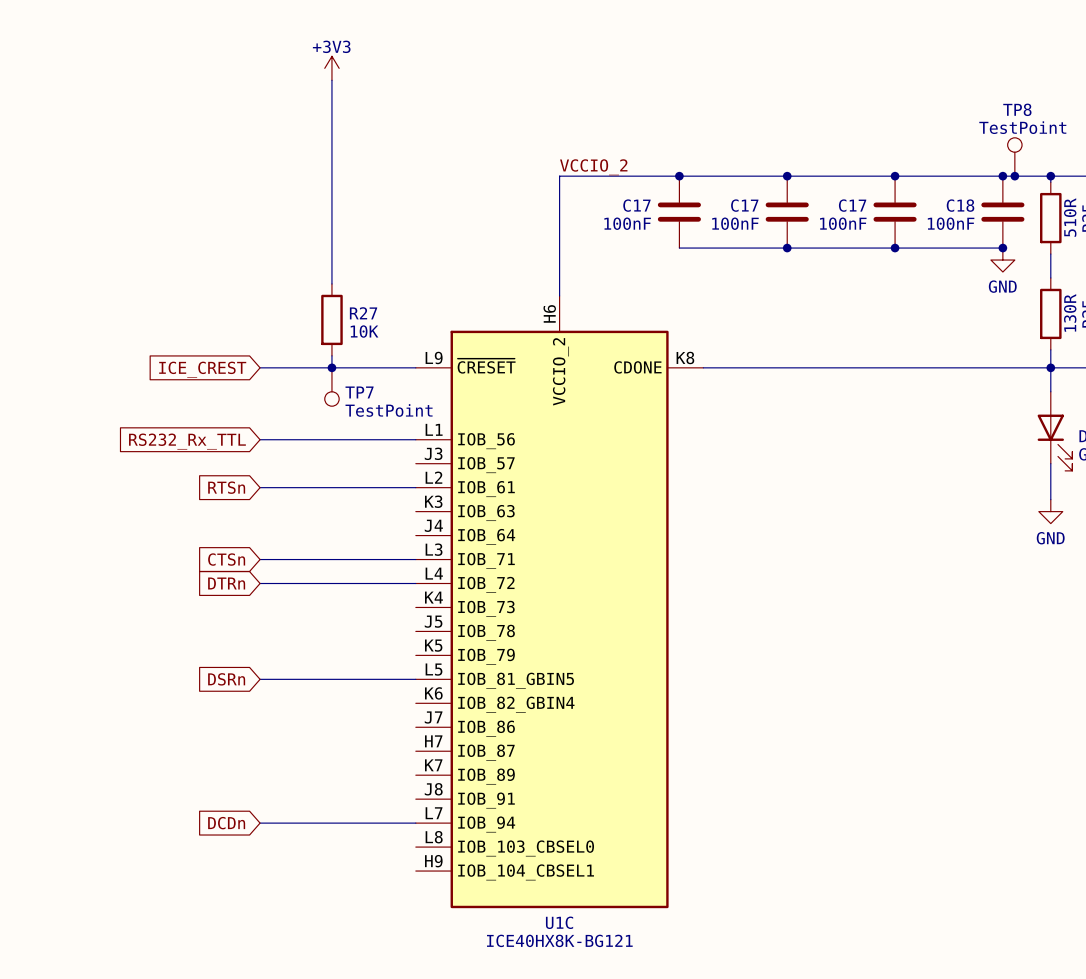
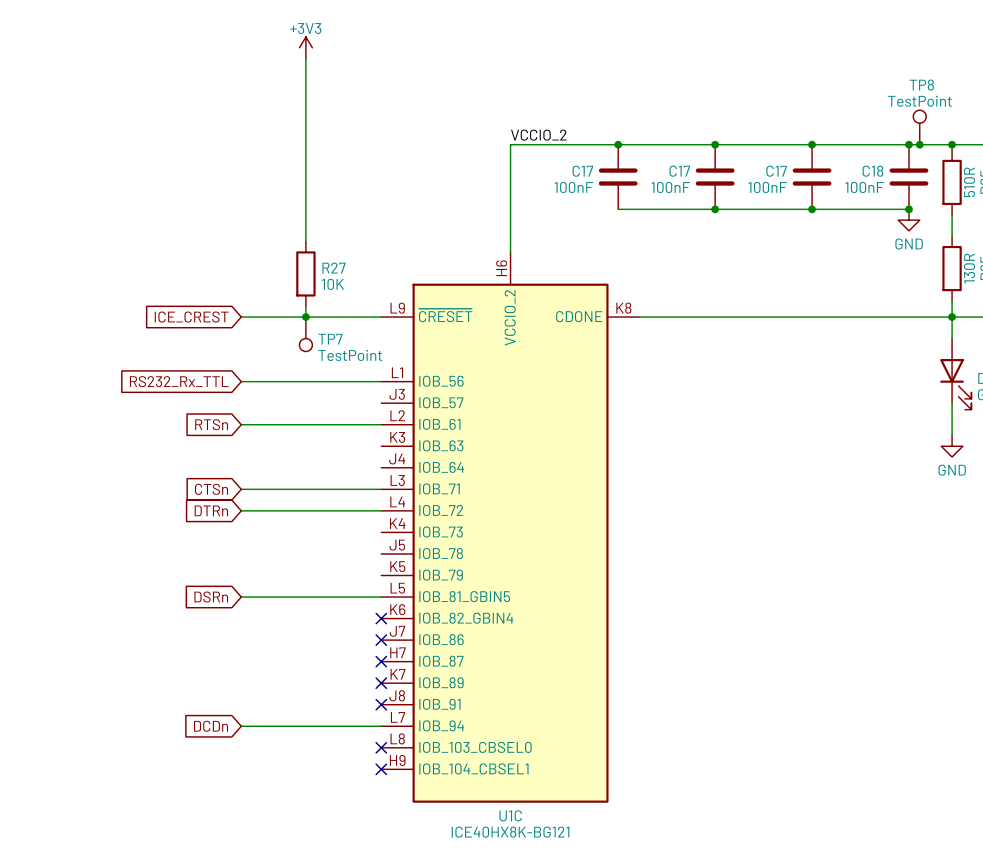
no-connect mark: none -> (381, 618)
no-connect mark: none -> (381, 640)
no-connect mark: none -> (381, 661)
no-connect mark: none -> (381, 683)
no-connect mark: none -> (381, 704)
no-connect mark: none -> (381, 747)
no-connect mark: none -> (381, 769)

